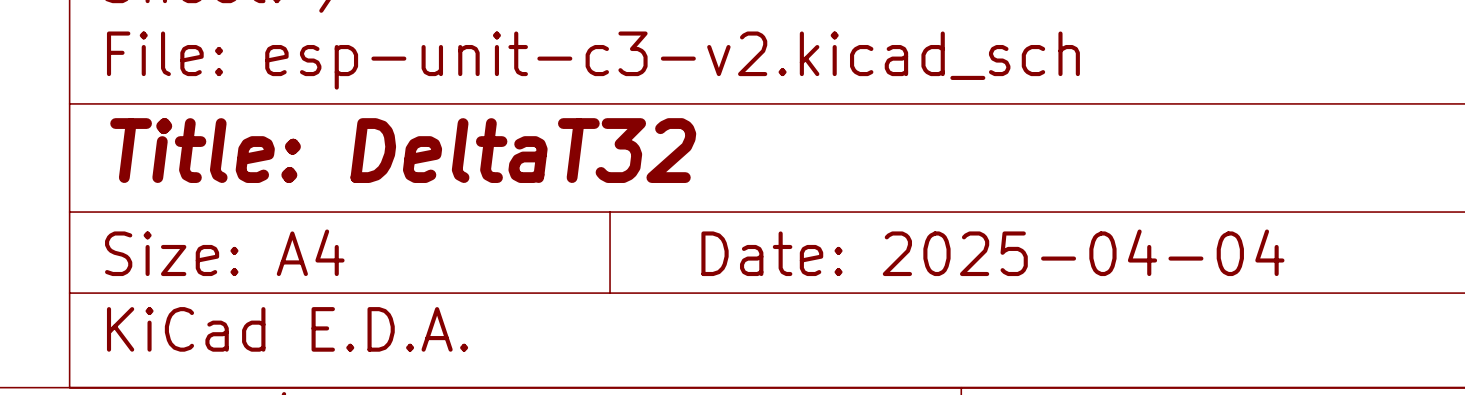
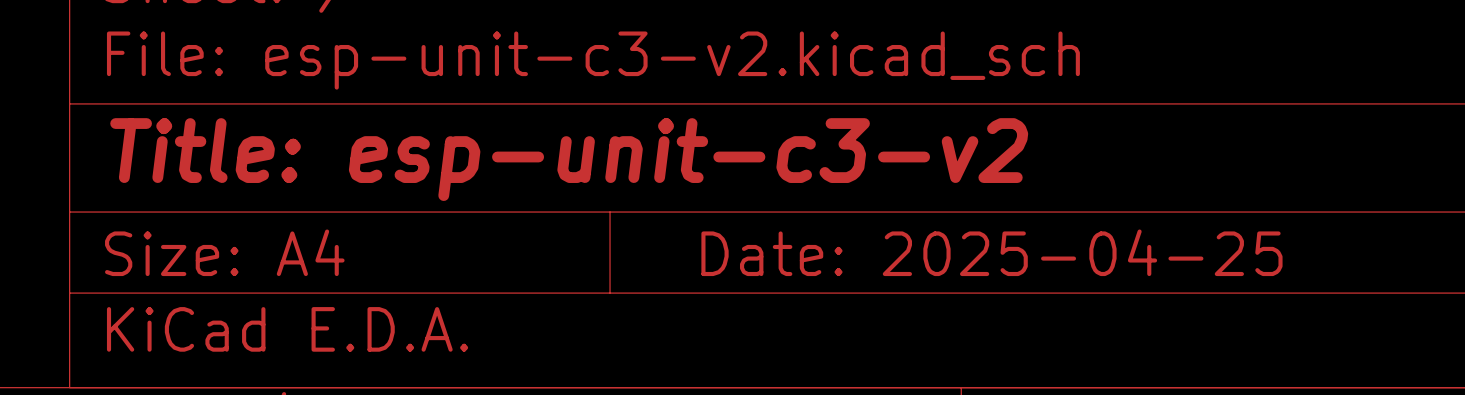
title block: Title: DeltaT32 (403, 150) -> Title: esp-unit-c3-v2 (569, 159)
title block: Date: 2025-04-04 (992, 252) -> Date: 2025-04-25 (991, 252)

